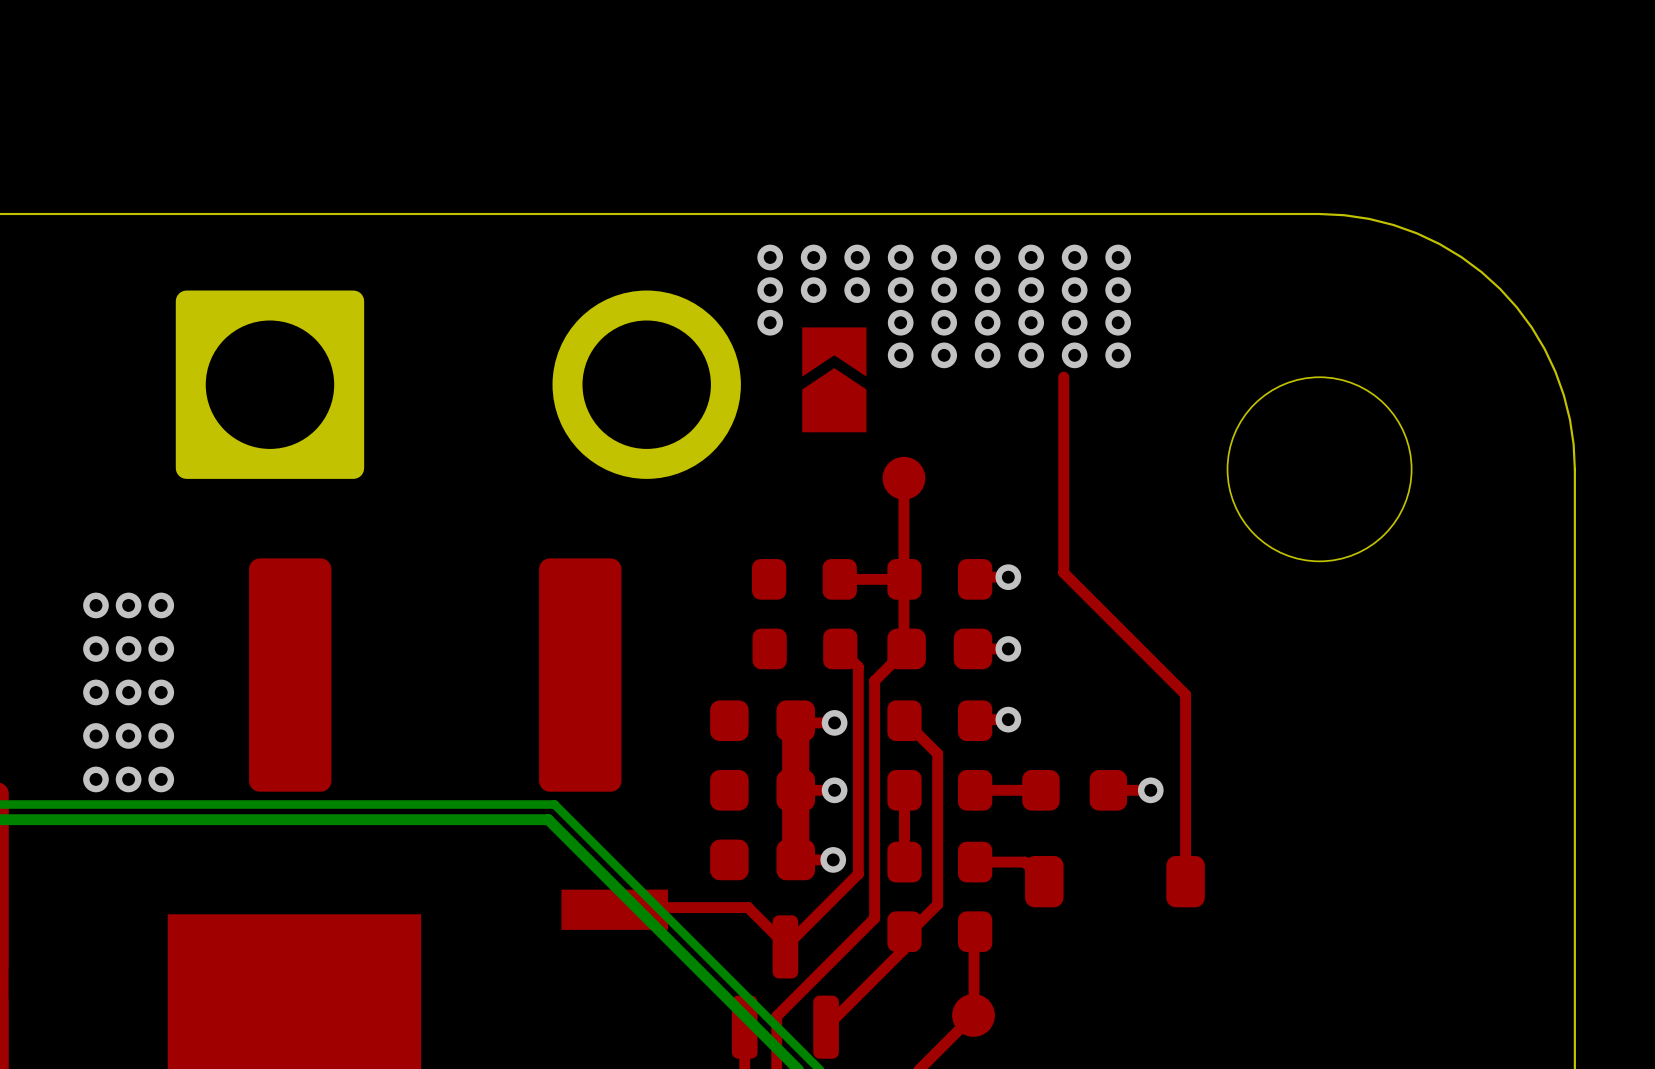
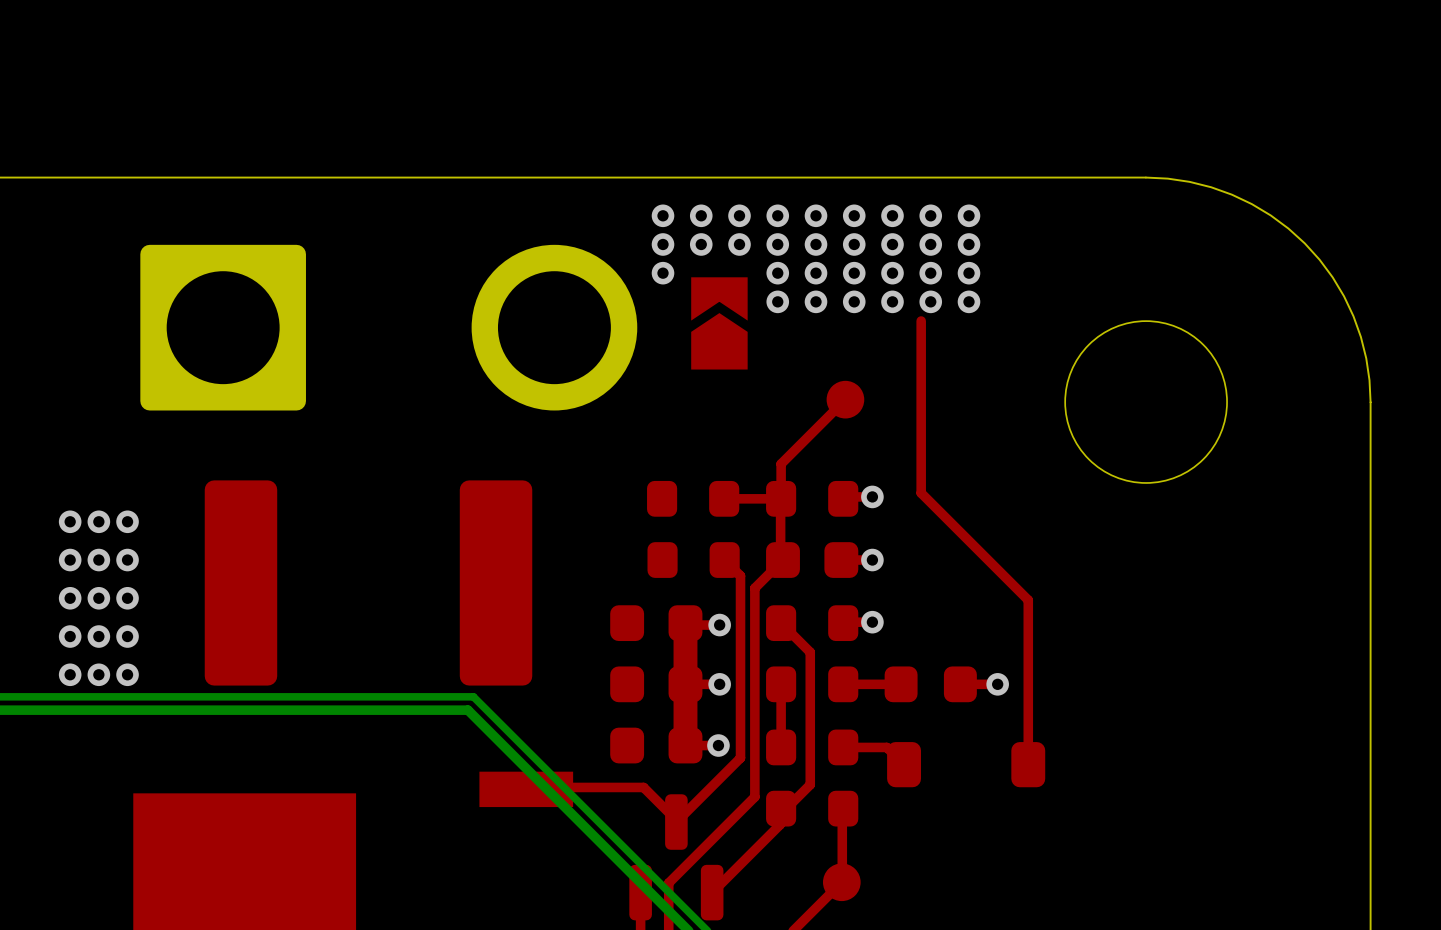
top track: none -> (845, 399) (781, 463) (781, 498)
top track: (903, 478) (903, 576) -> none
part position: (903, 478) -> (845, 399)

